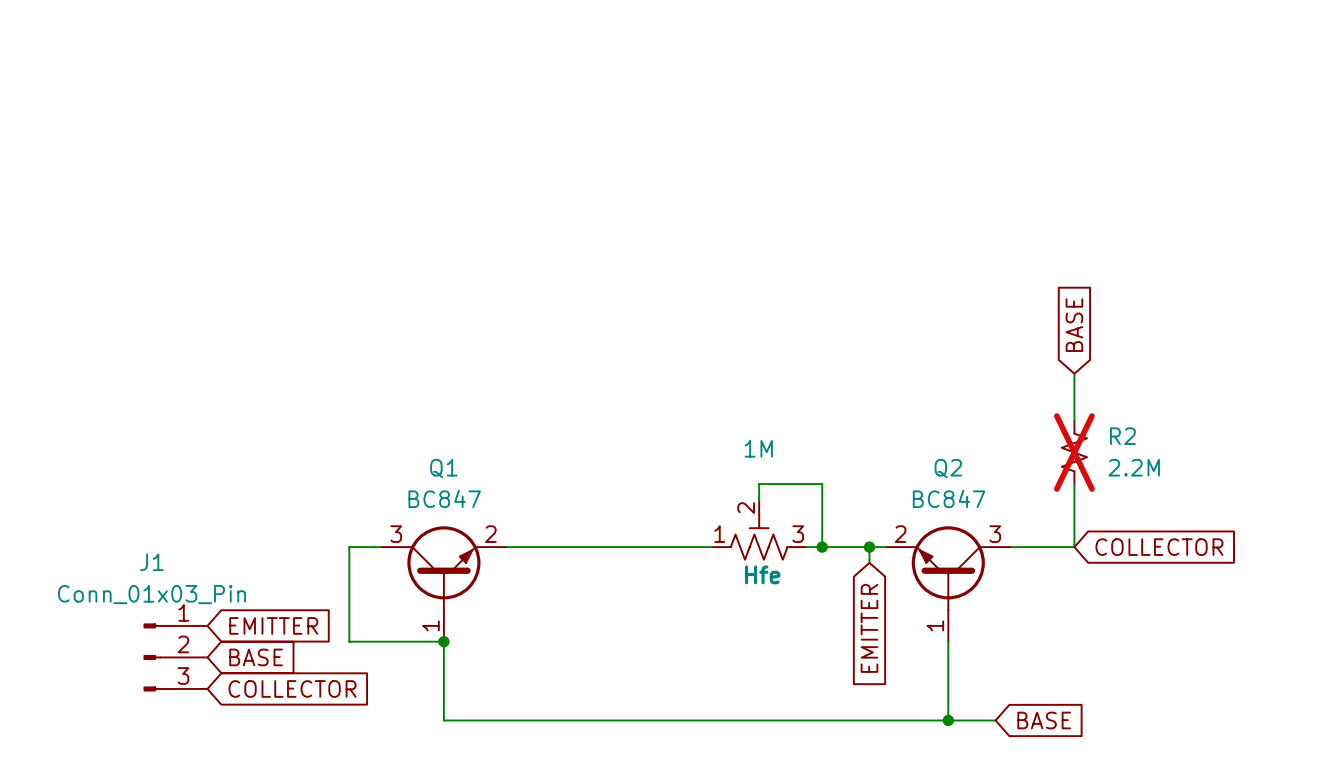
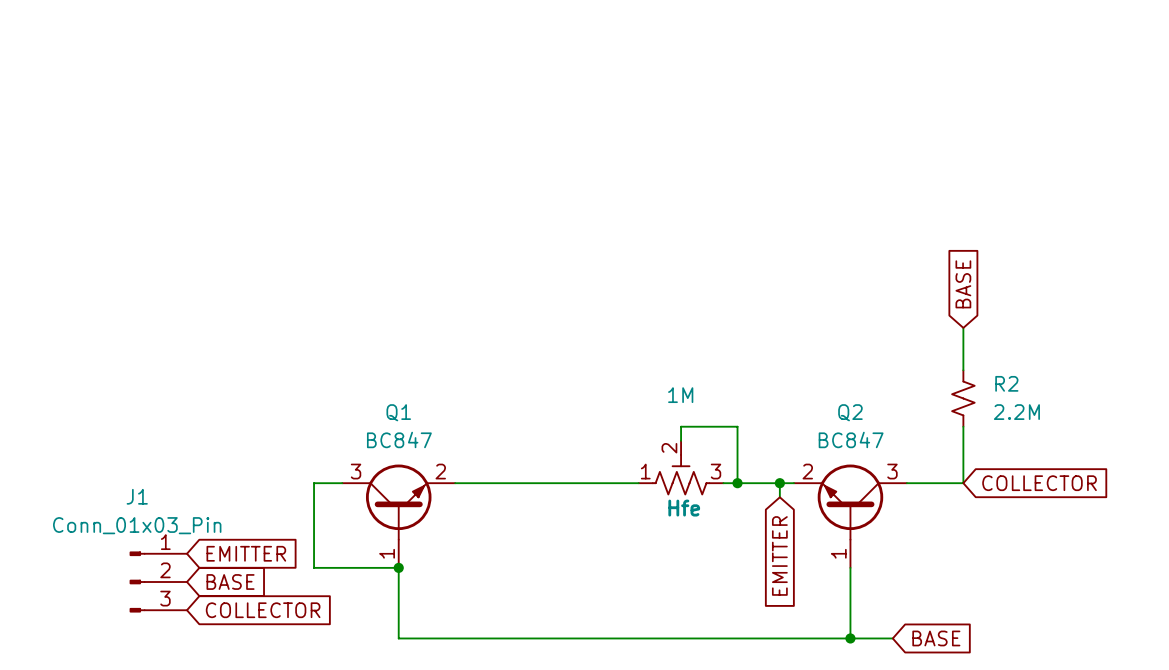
R2 do-not-place cross: (1074, 452) -> none

